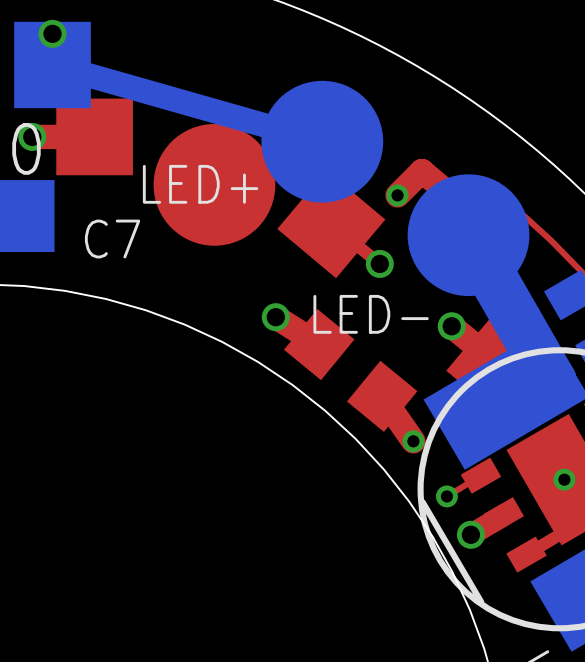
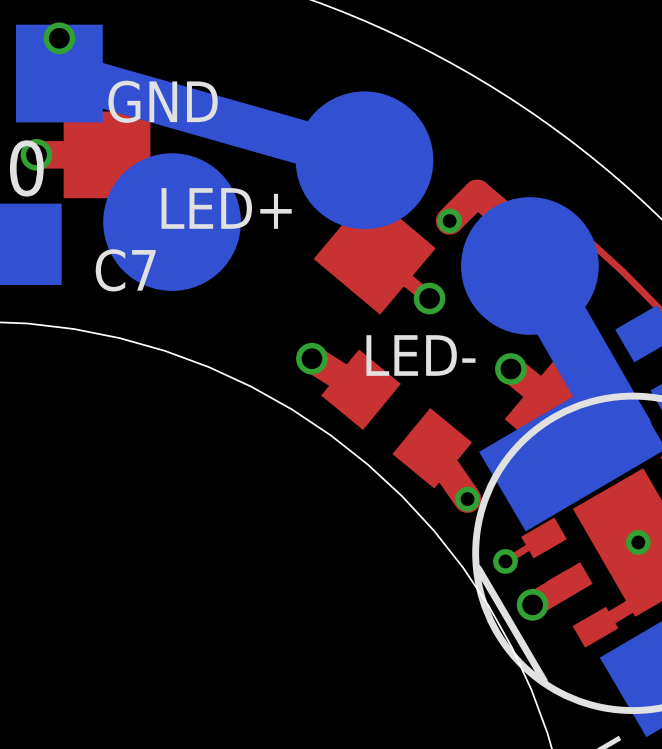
bottom track width: thin (52, 65) (322, 141) -> thick (59, 73) (364, 160)
part: (214, 184) -> none
GND: none -> (172, 222)

